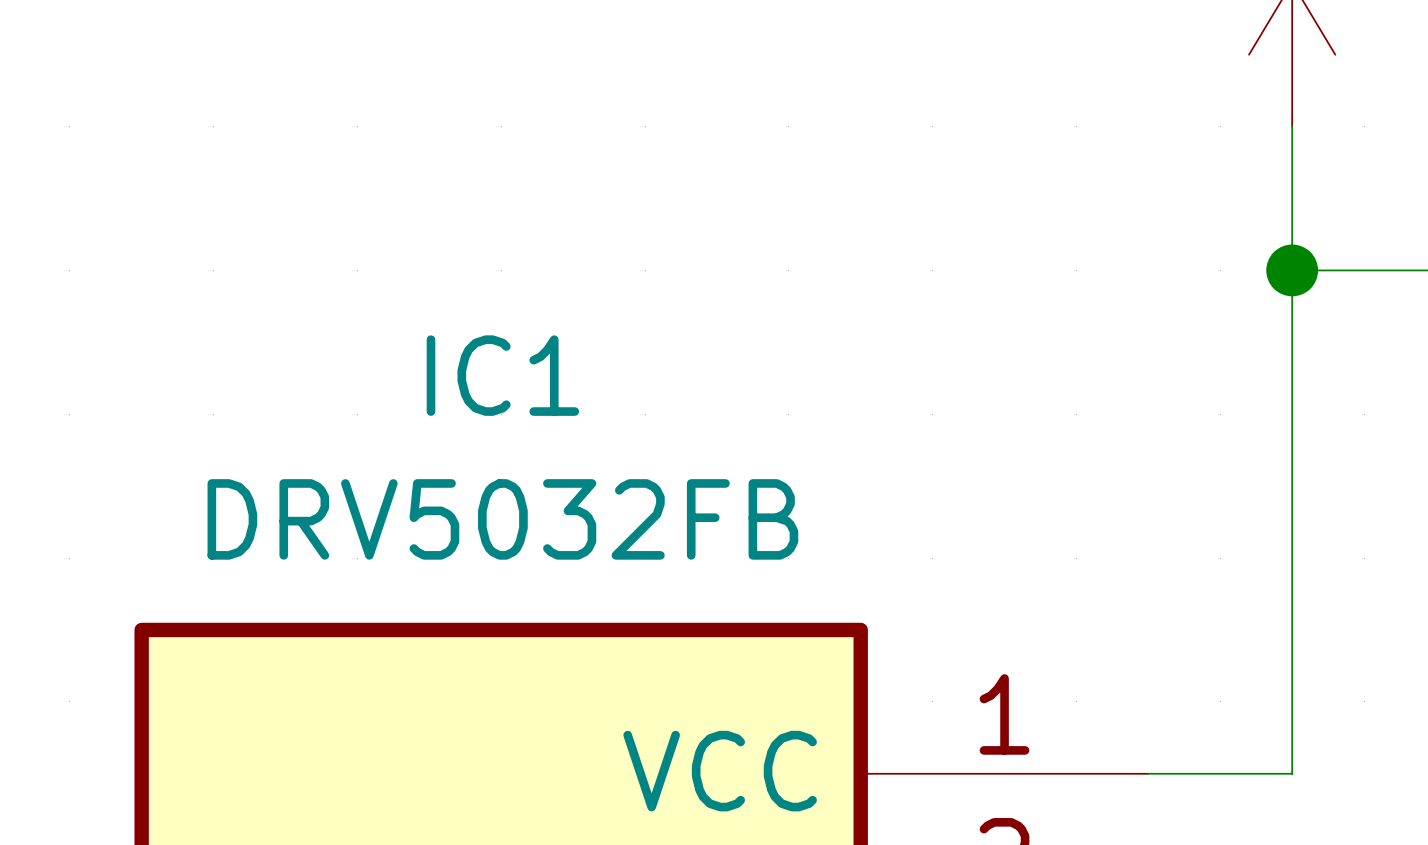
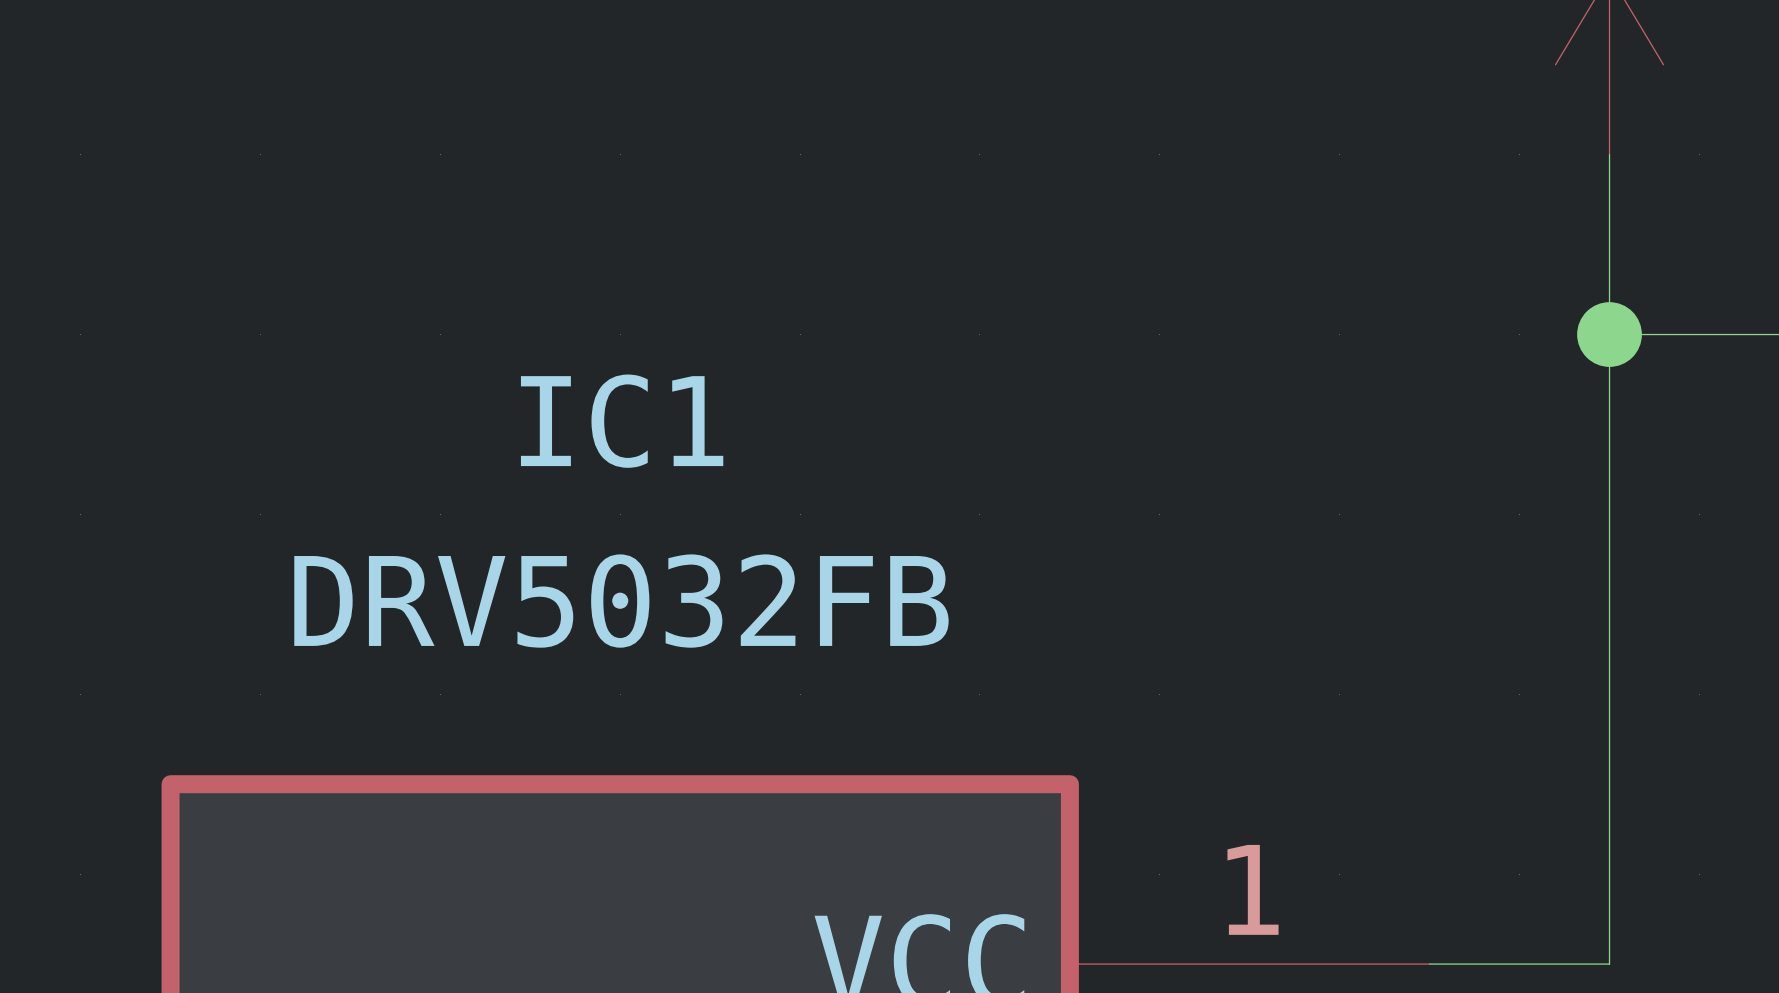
IC1 name position: IC1 (502, 375) -> IC1 (622, 421)
IC1 value position: DRV5032FB (502, 519) -> DRV5032FB (621, 601)

